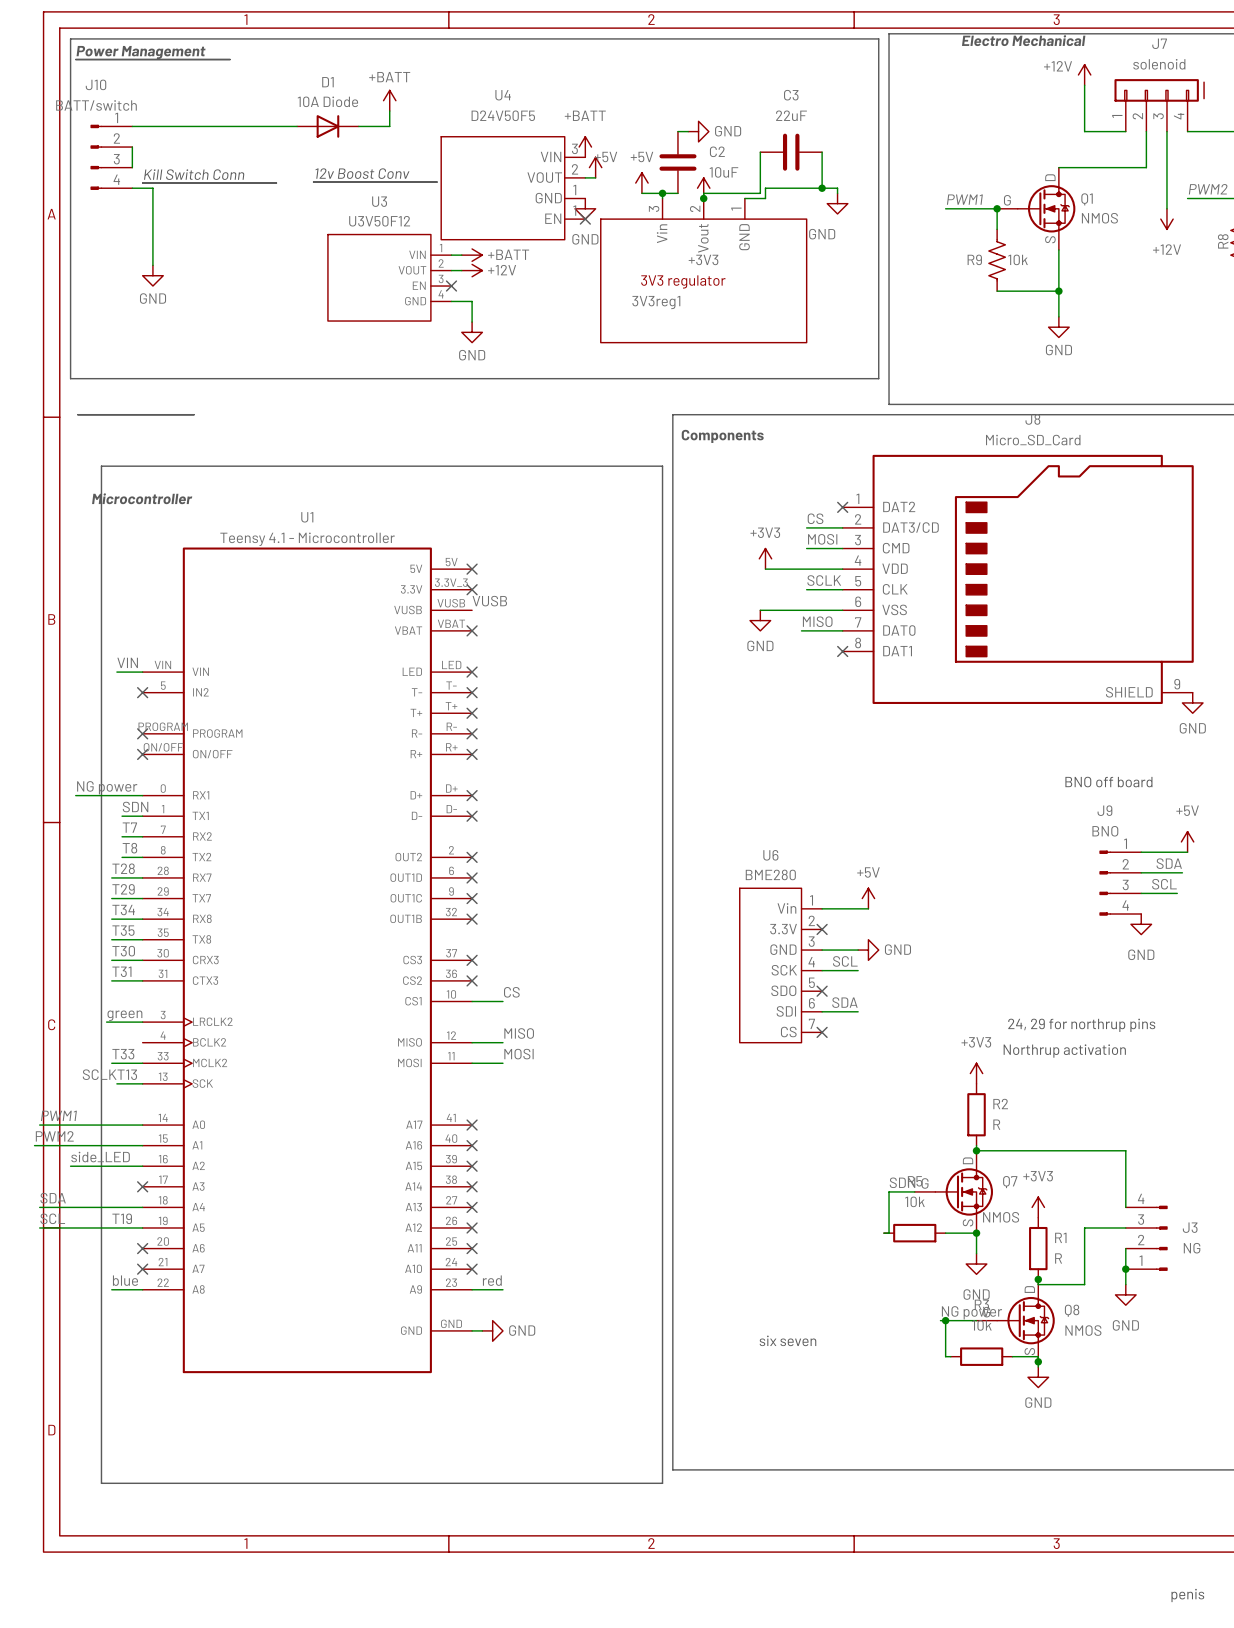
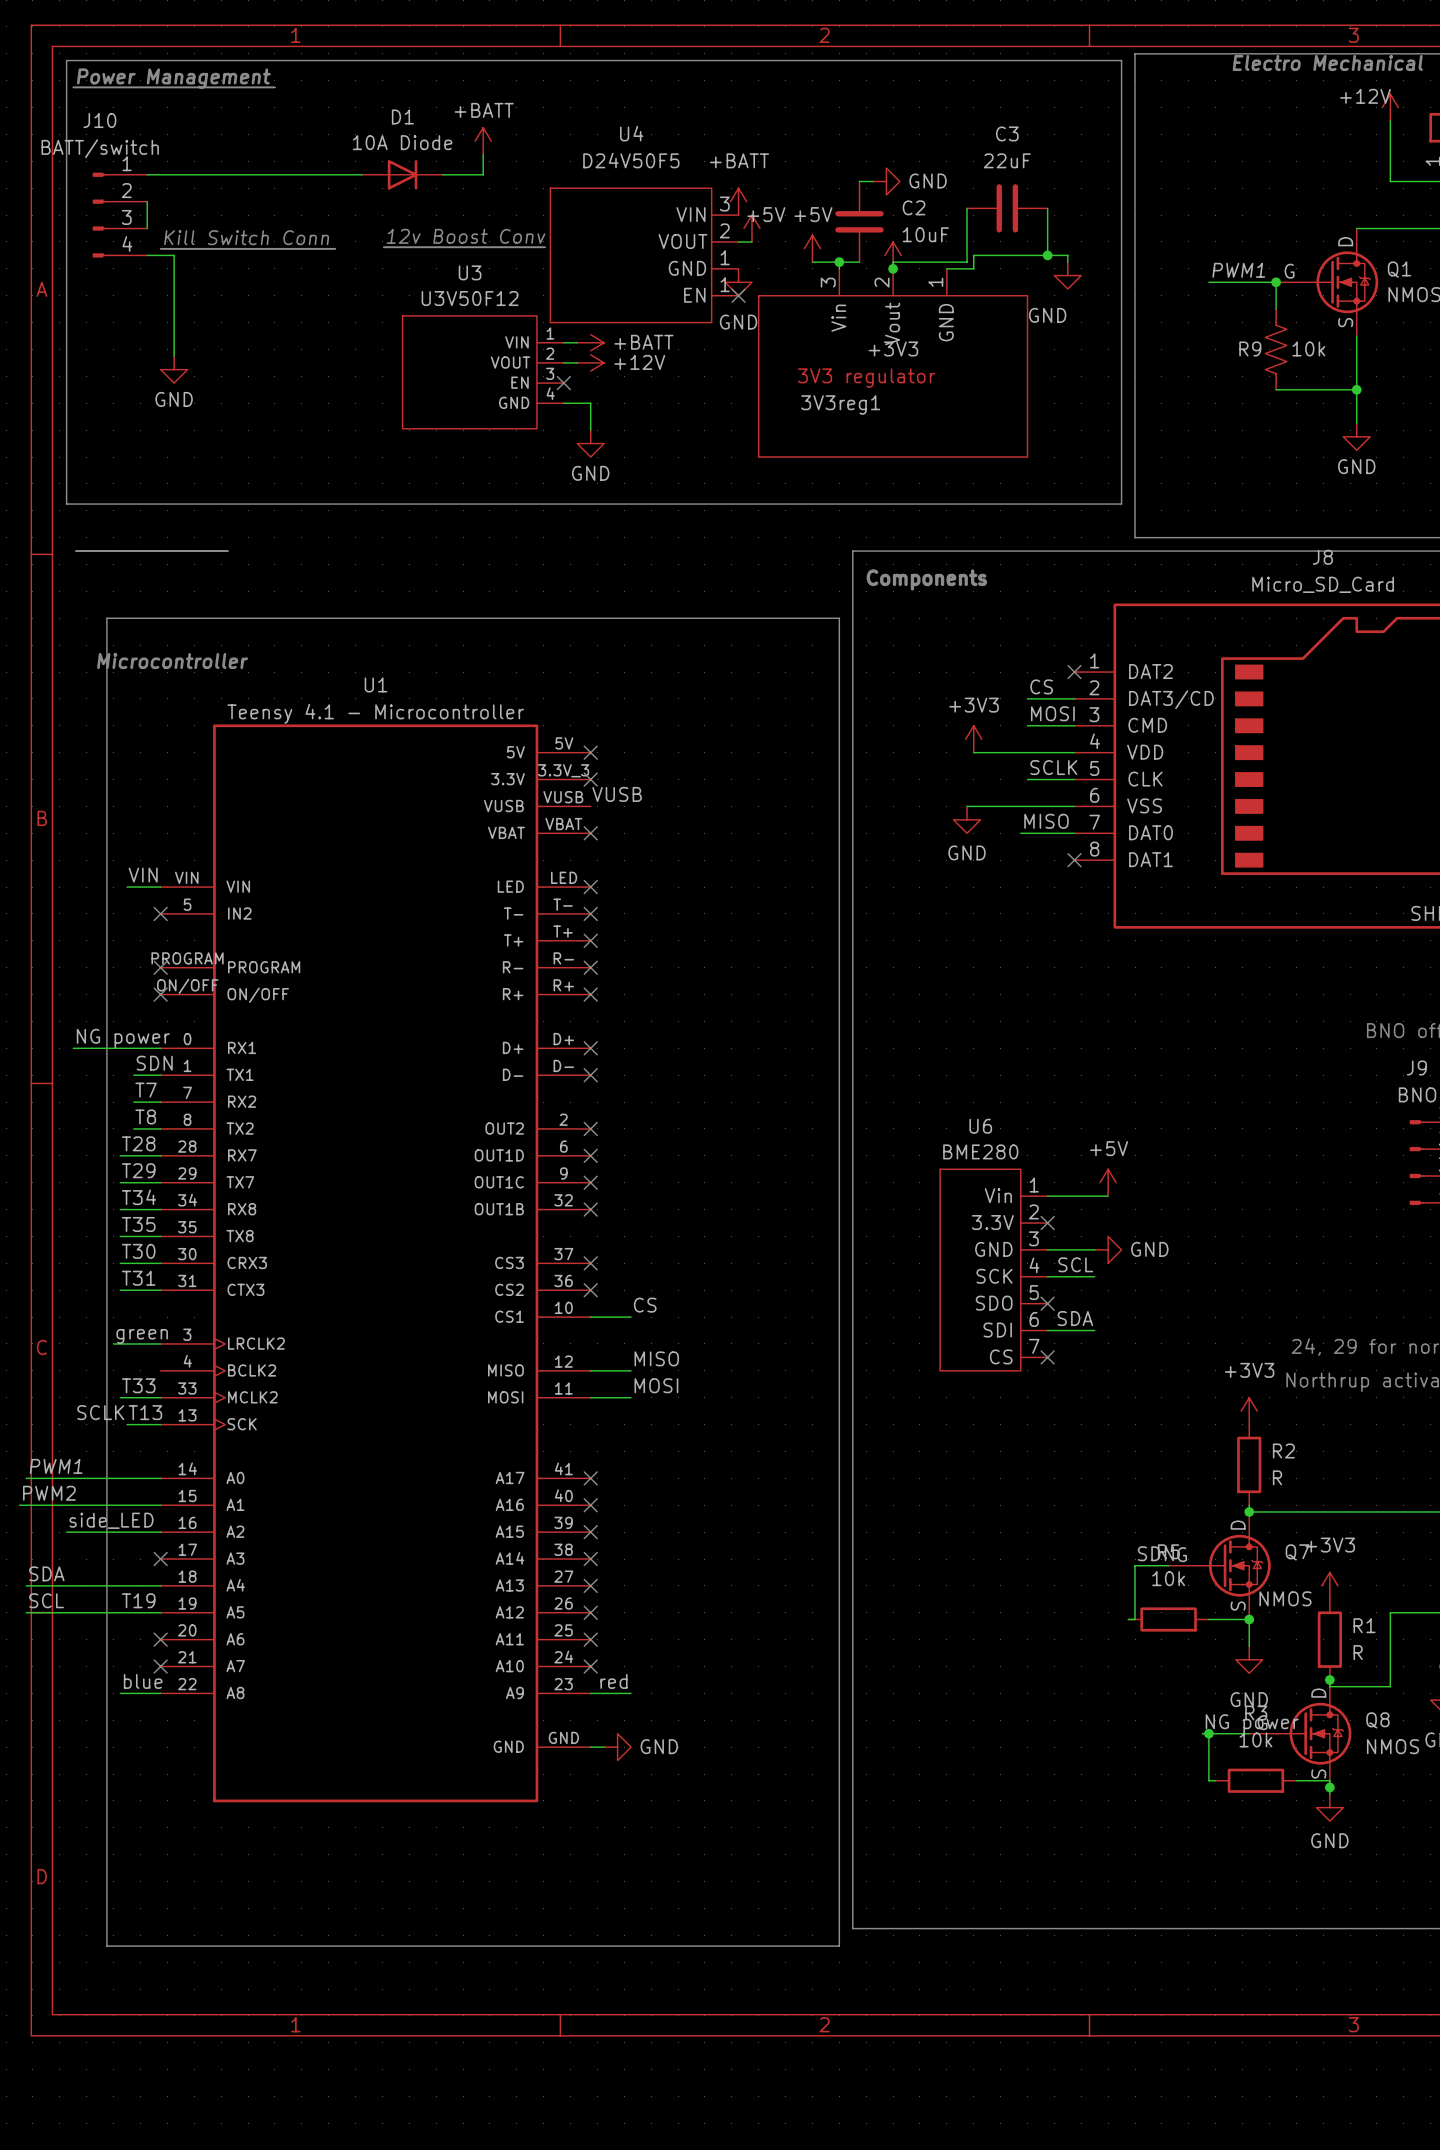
text: six seven (788, 1340) -> none

